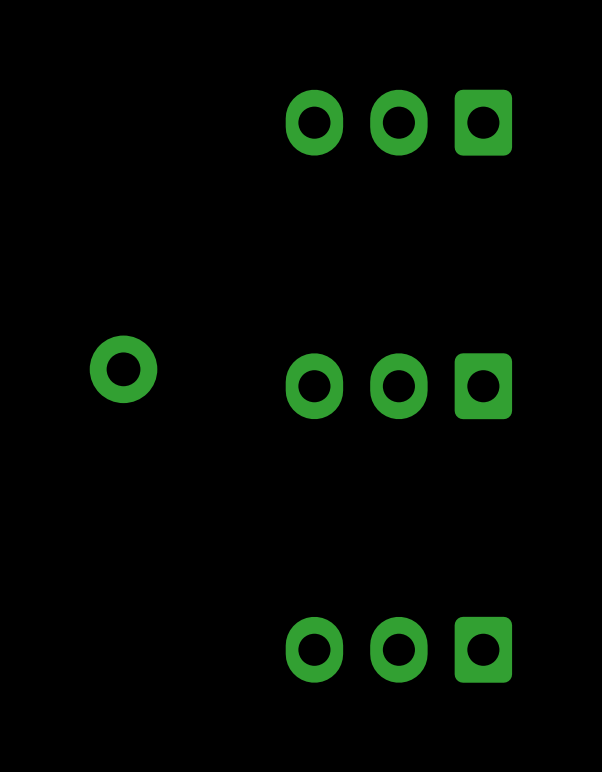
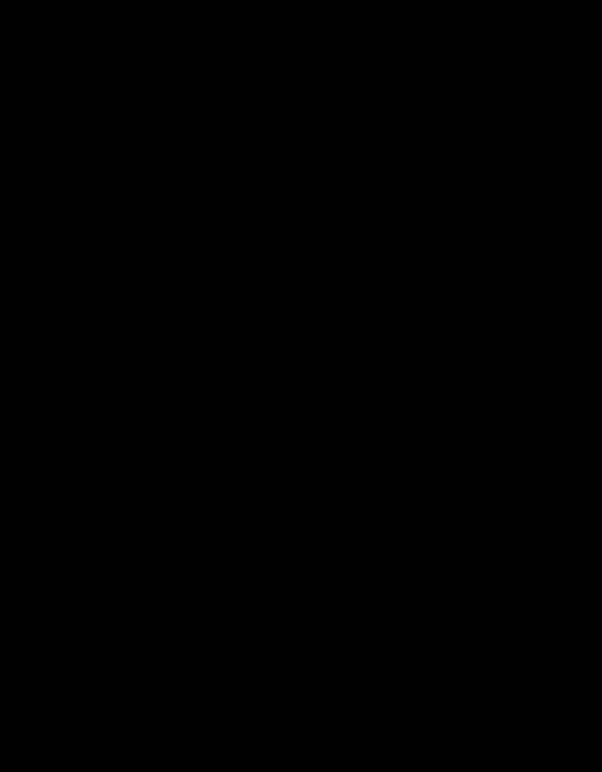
part: (398, 122) -> none
part: (123, 369) -> none
part: (398, 386) -> none
part: (398, 649) -> none

